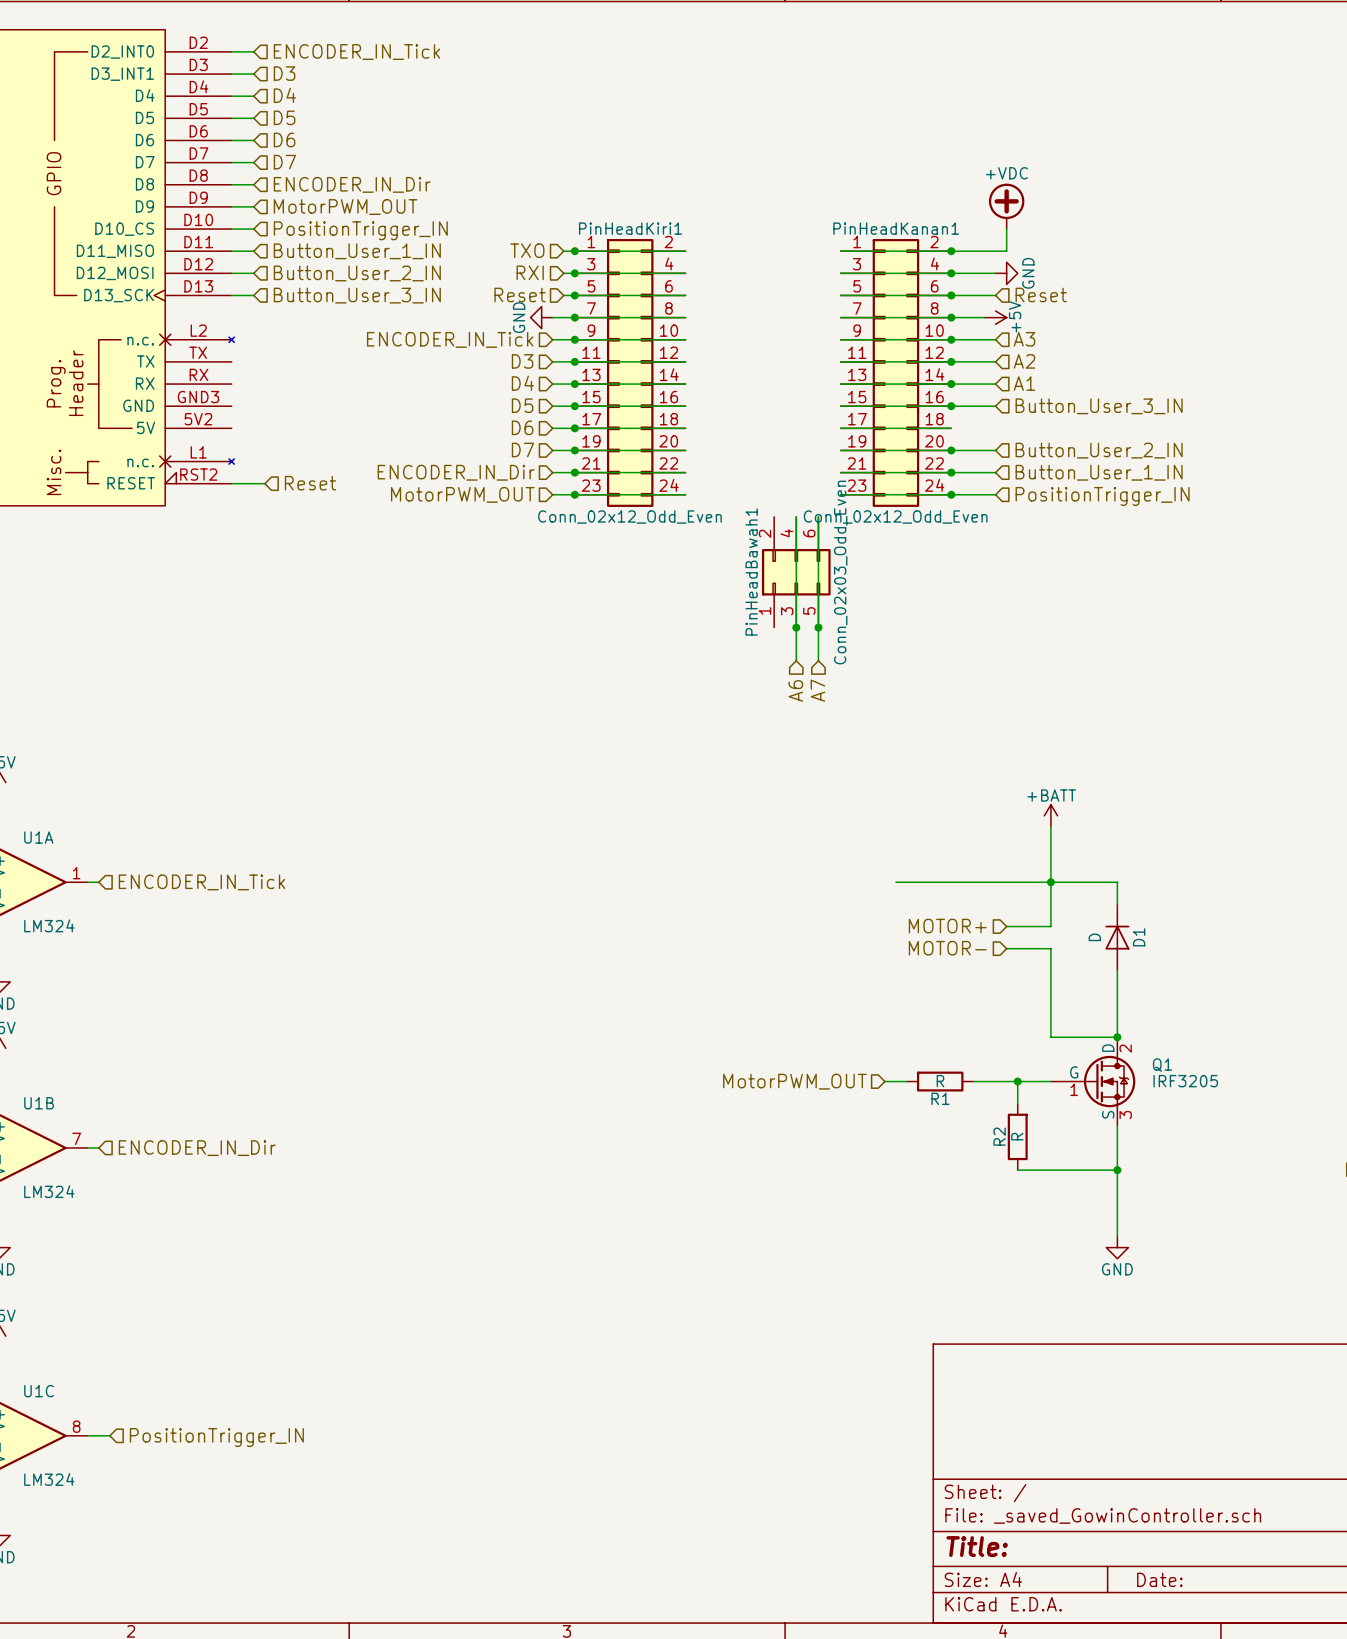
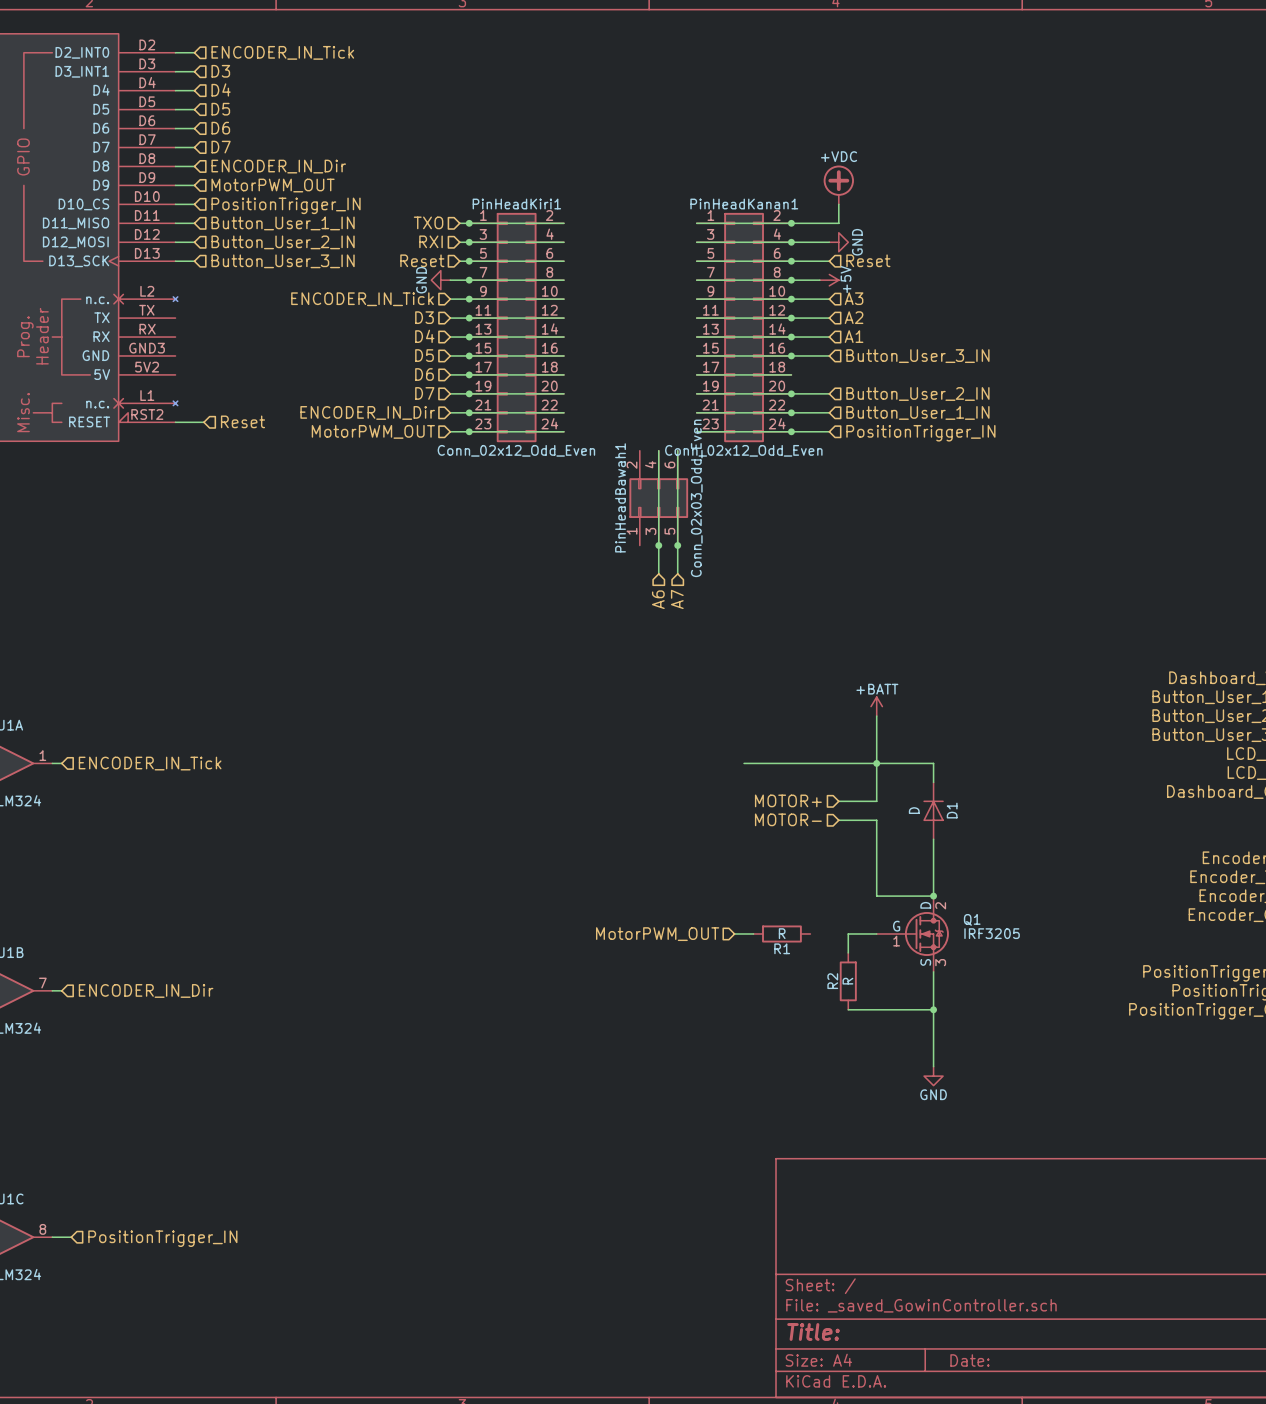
wire: (973, 1081) (1017, 1081) -> none
junction: (1017, 1081) -> none

